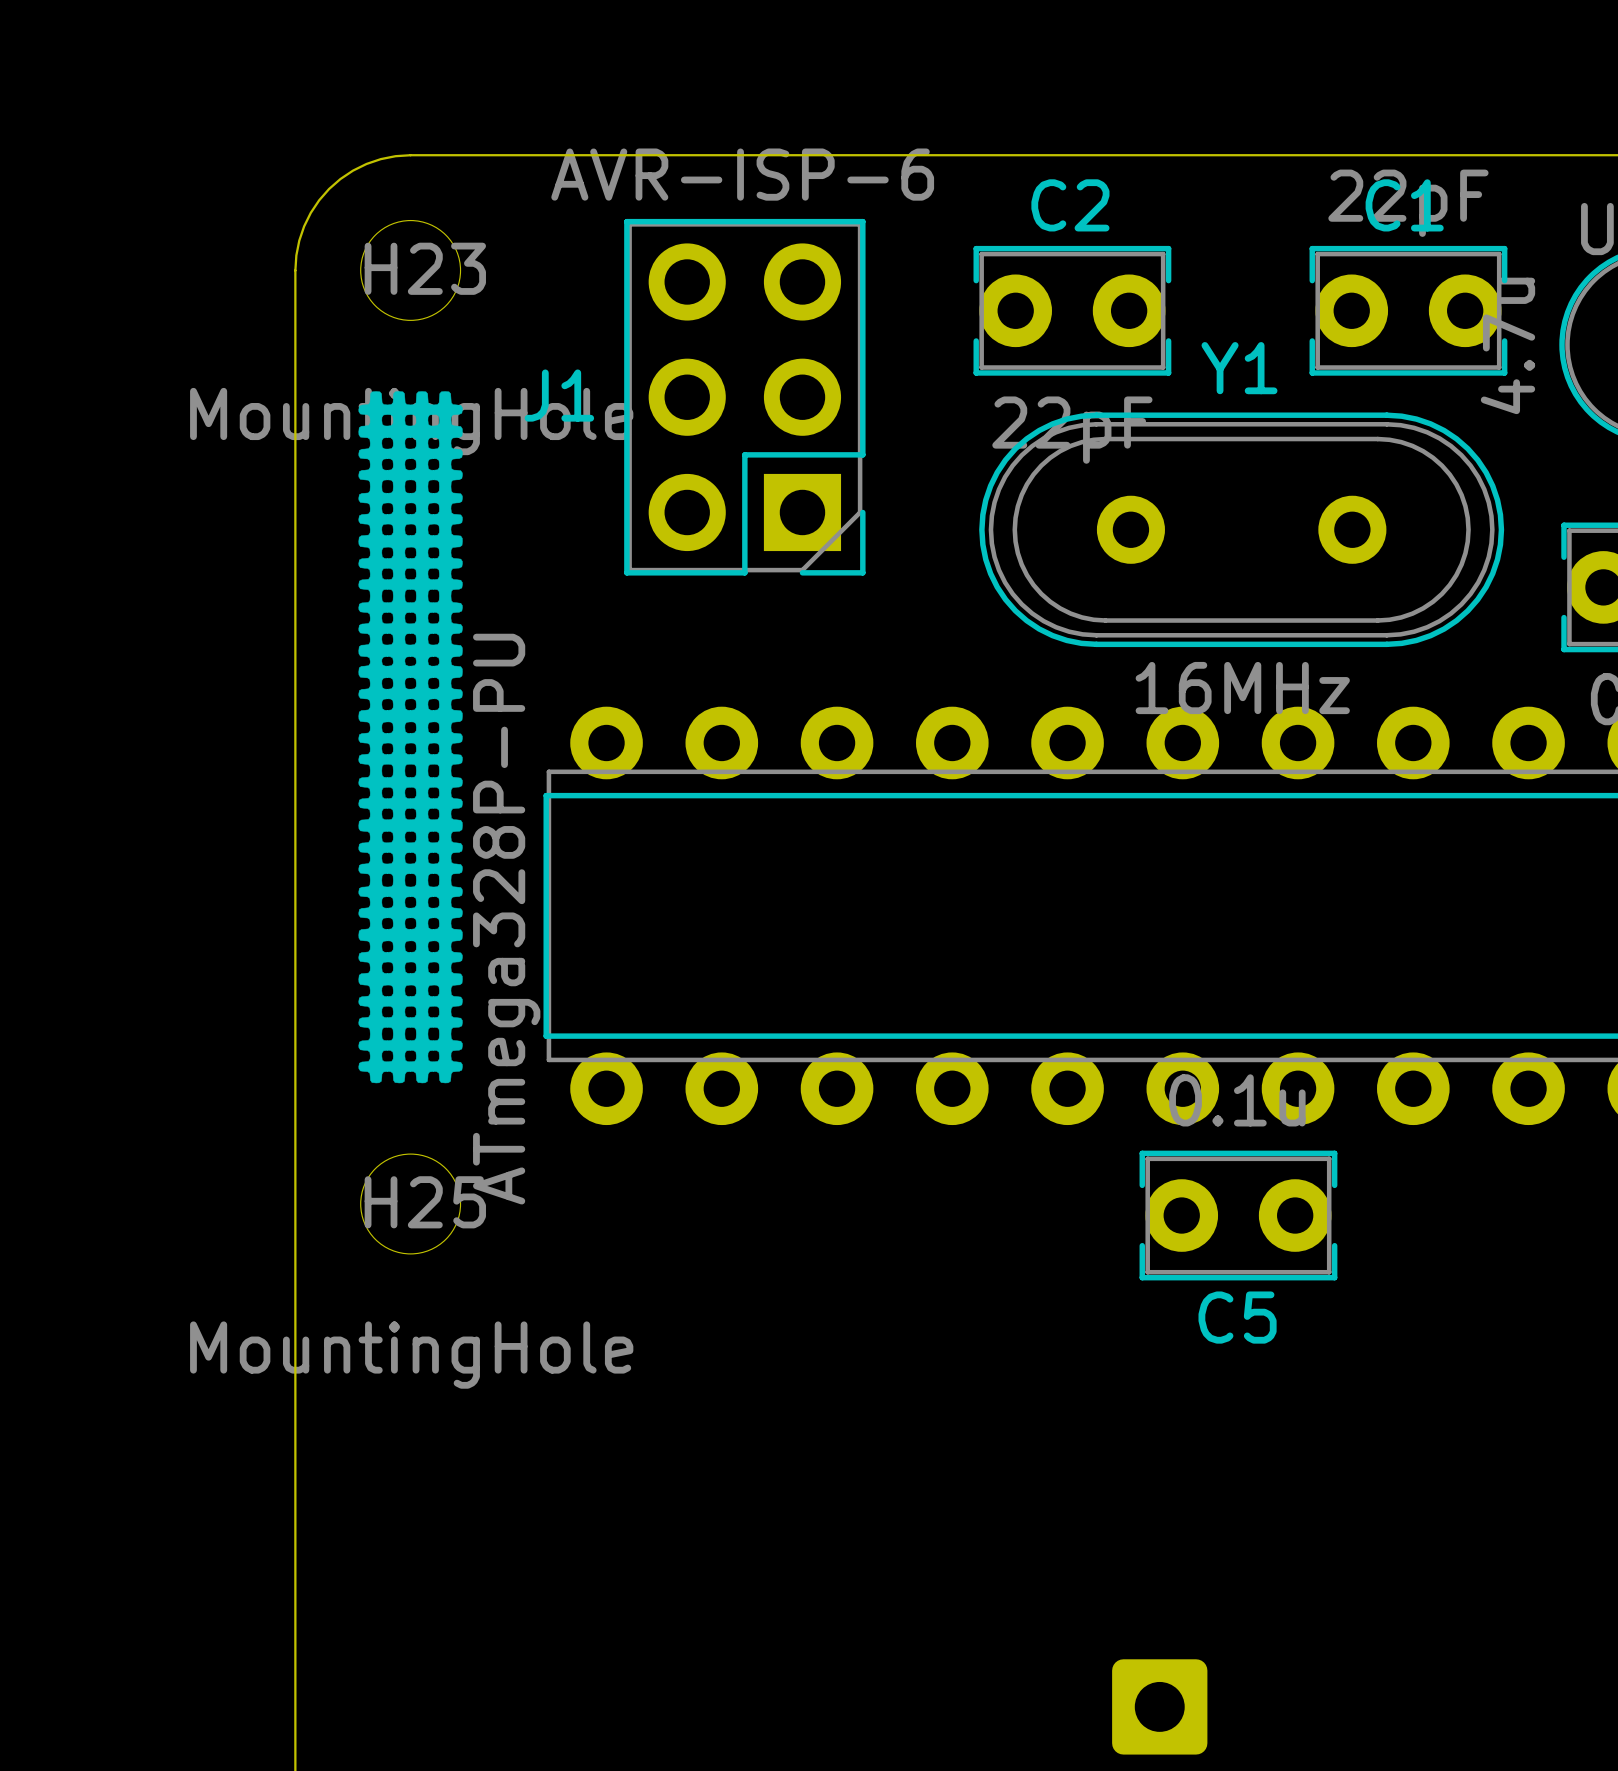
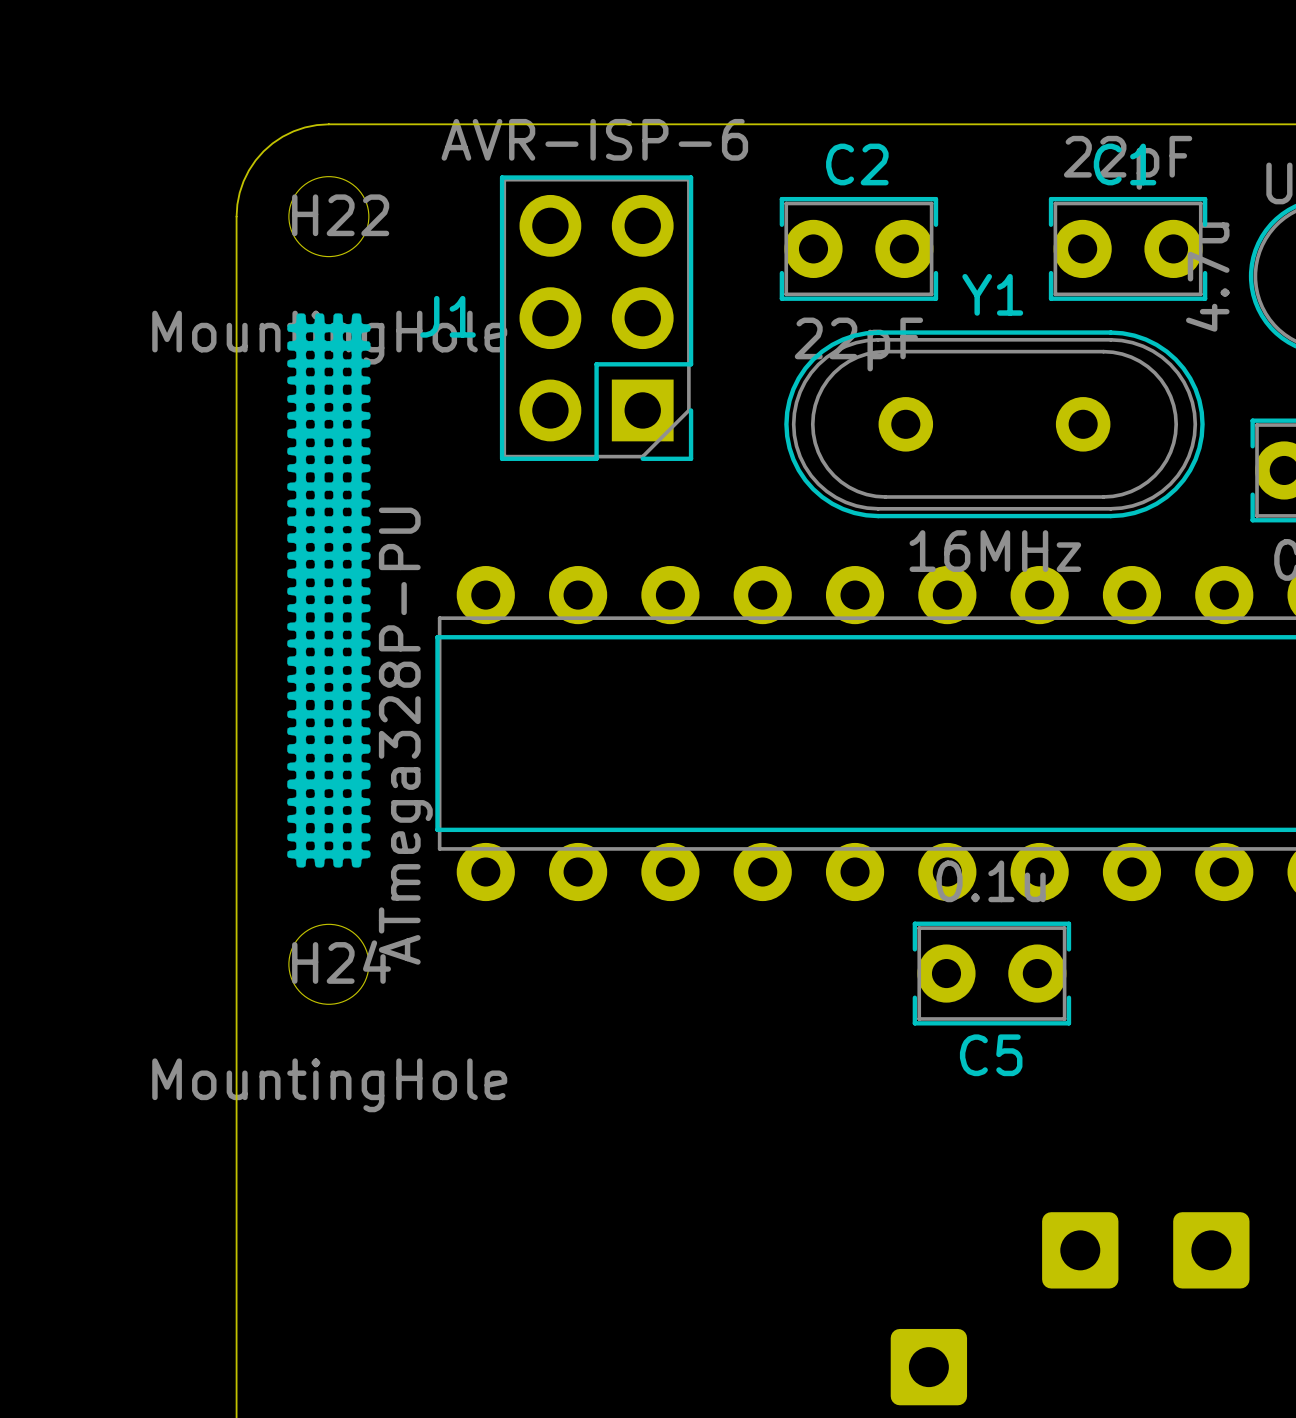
H23 name: H23 (425, 268) -> H22 (340, 215)
H25 name: H25 (425, 1202) -> H24 (341, 962)
part: none -> (1080, 1250)
part: none -> (1211, 1250)

